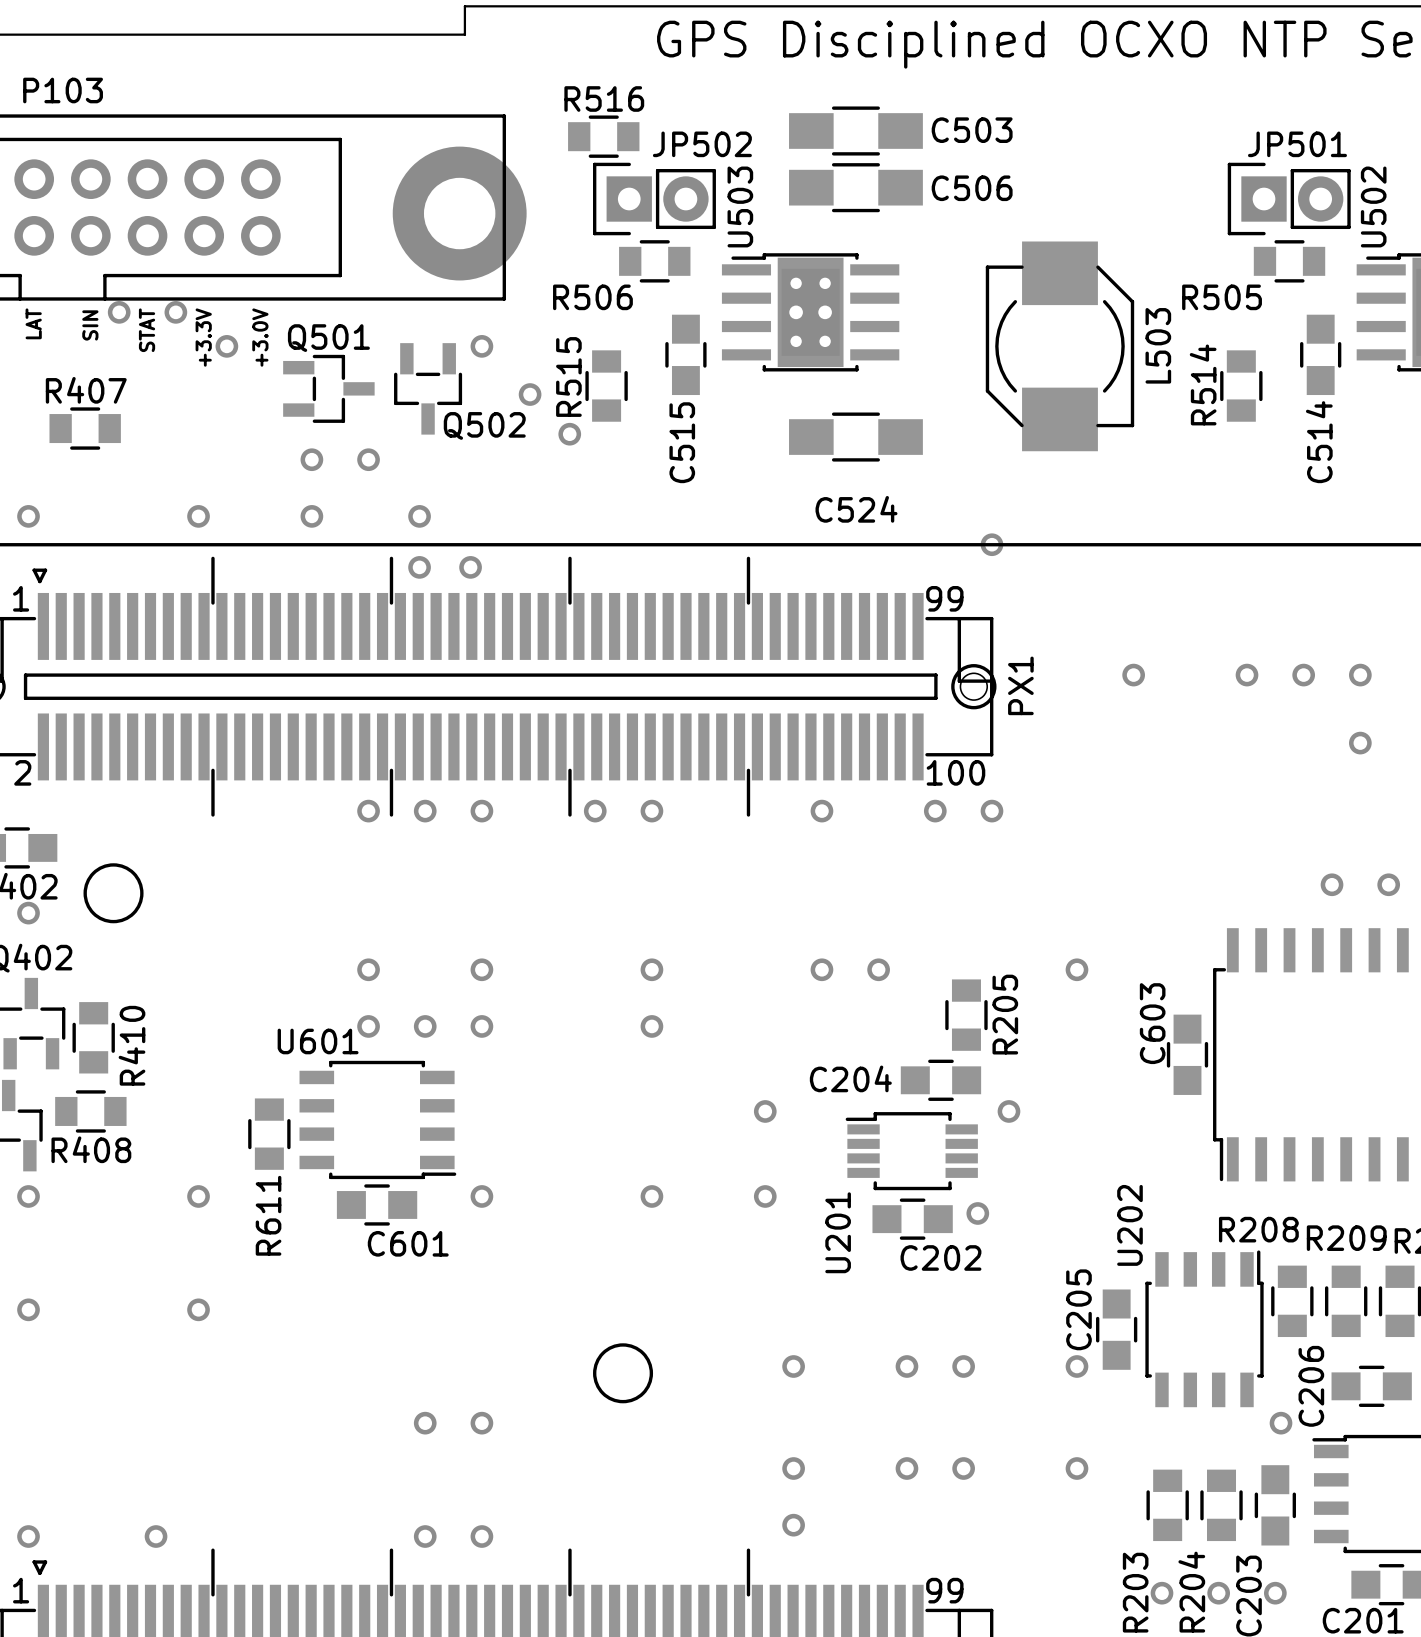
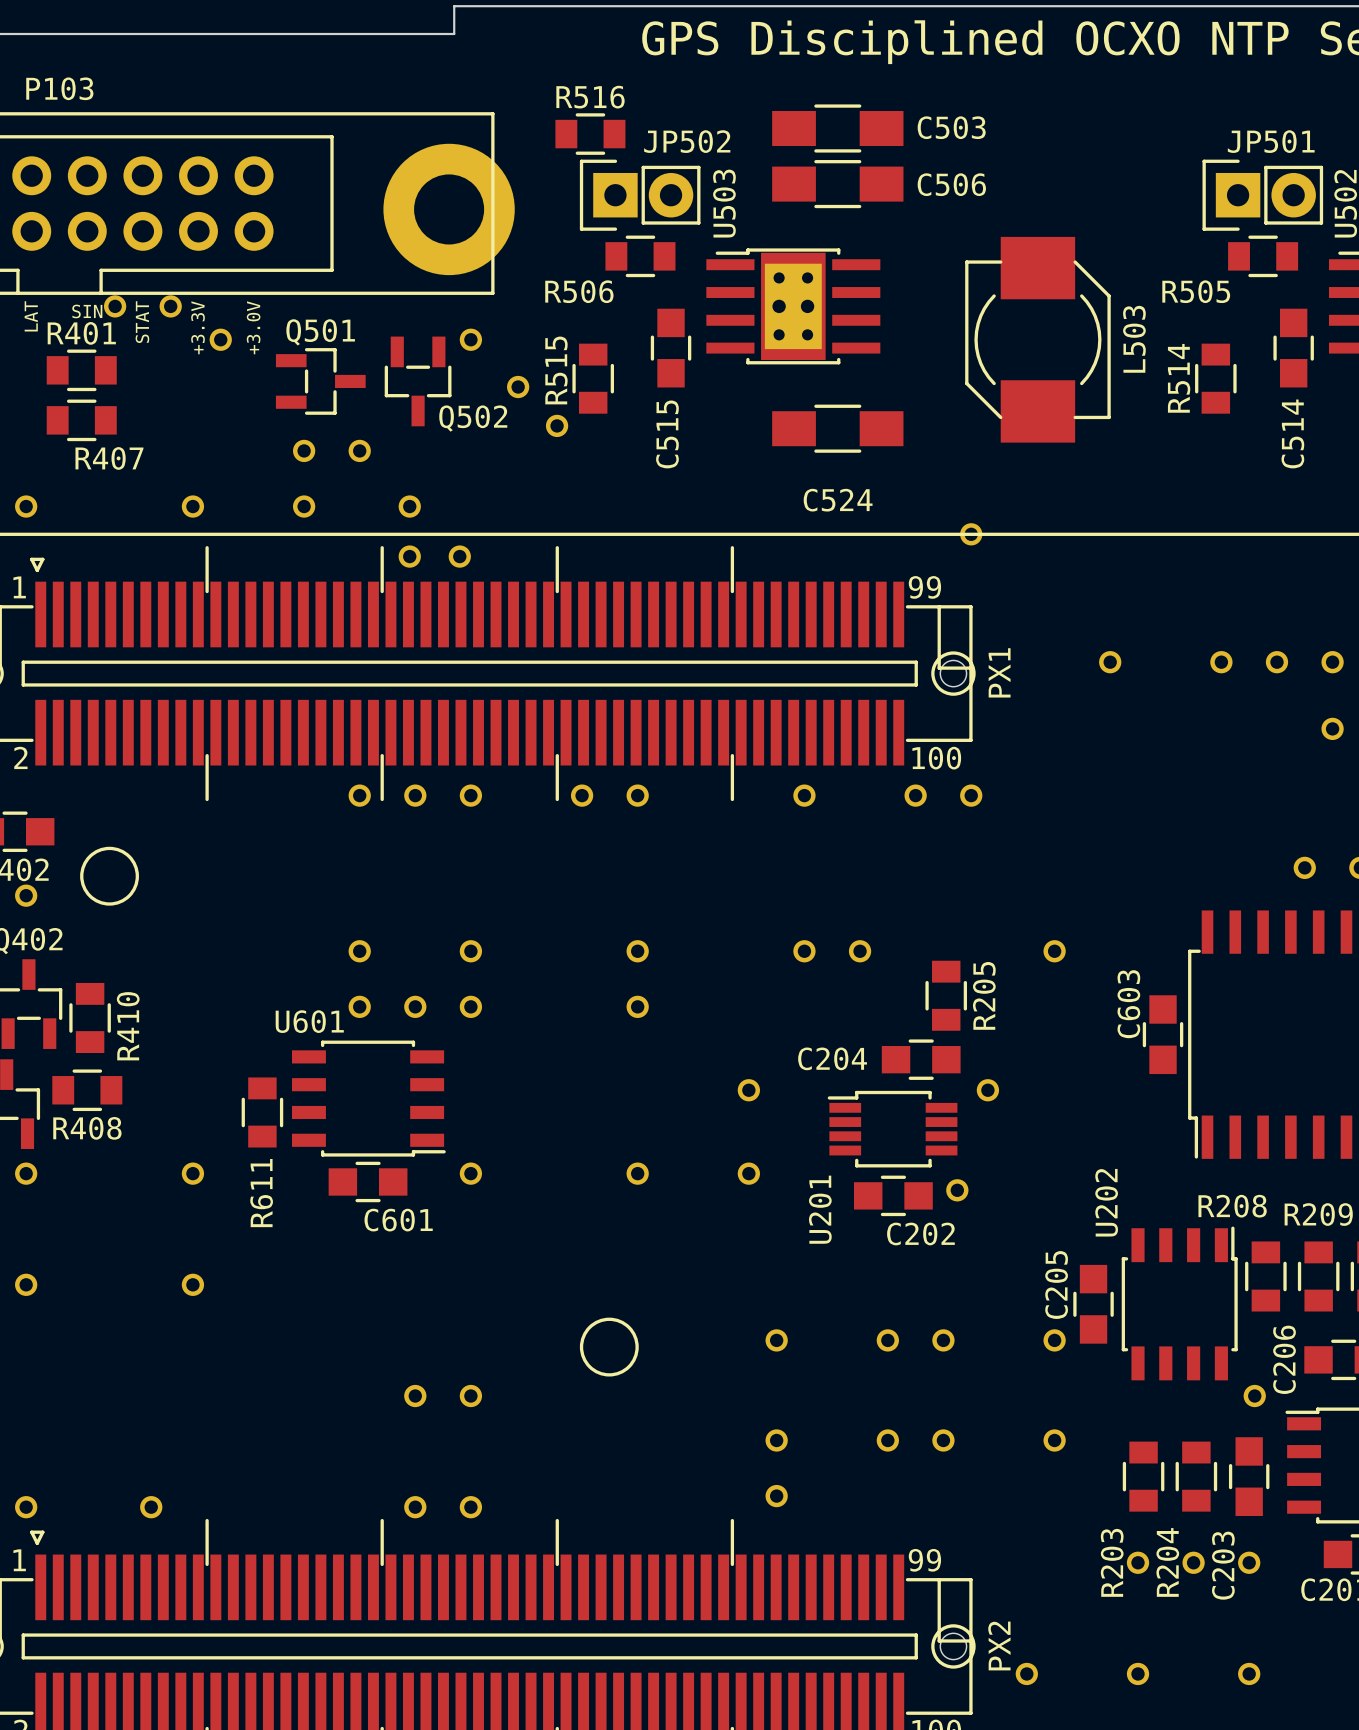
text rotation: 0° (90, 325) -> 90° clockwise (87, 311)
R401: none -> (81, 370)
R407 name position: R407 (86, 390) -> R407 (109, 458)

